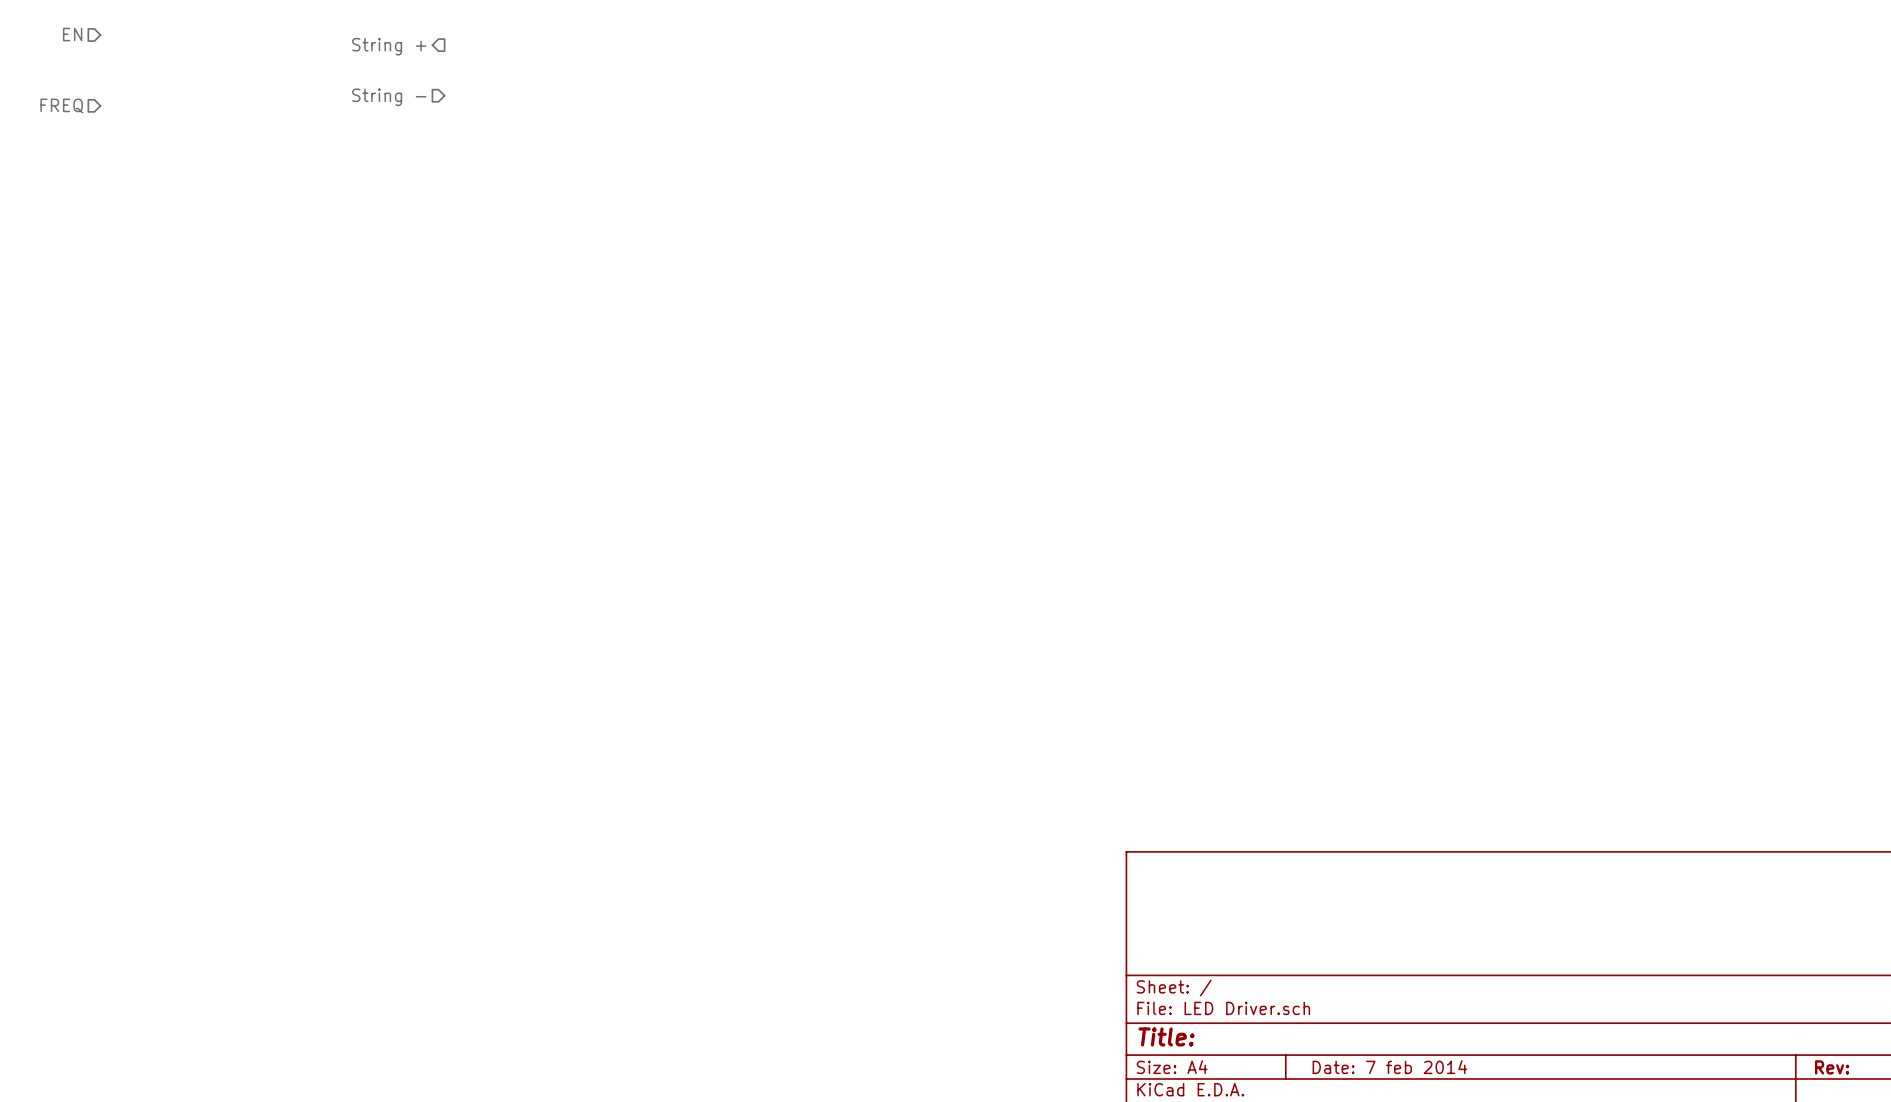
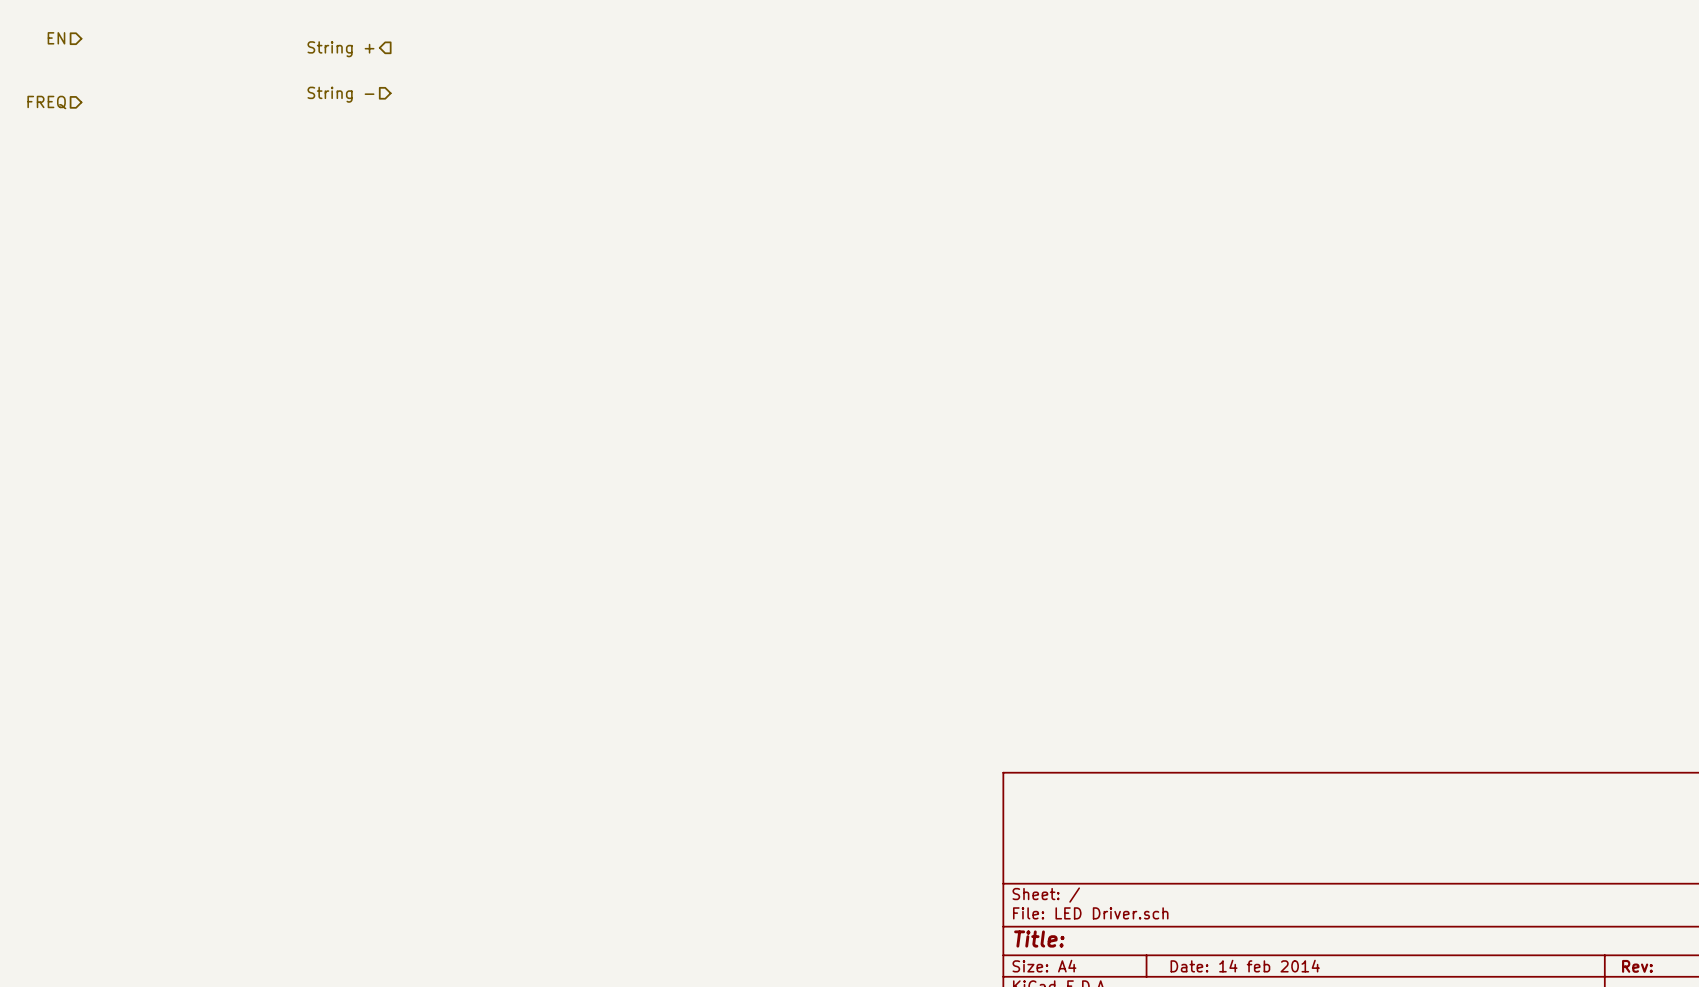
title block: Date: 7 feb 2014 (1389, 1067) -> Date: 14 feb 2014 (1245, 966)

